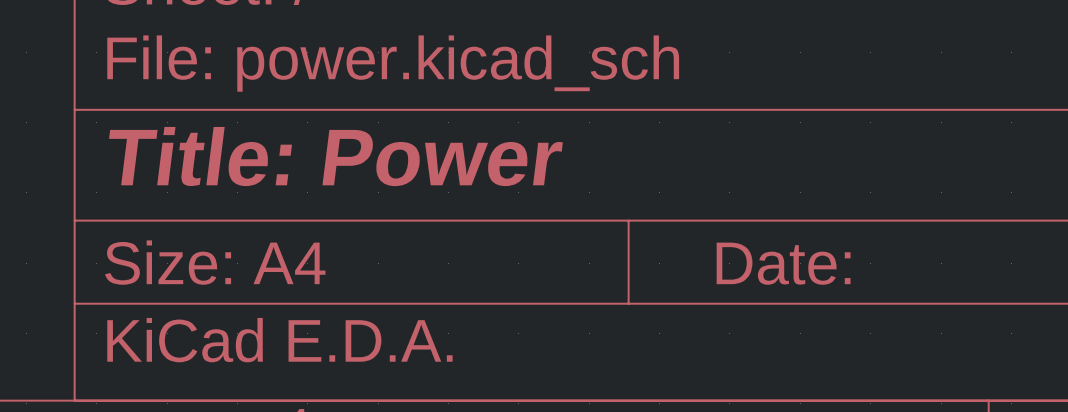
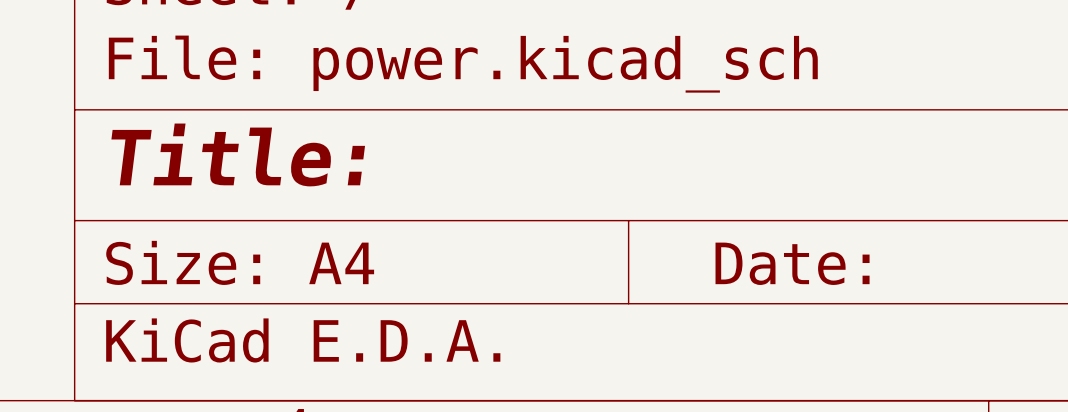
title block: Title: Power (335, 156) -> Title: (238, 154)

